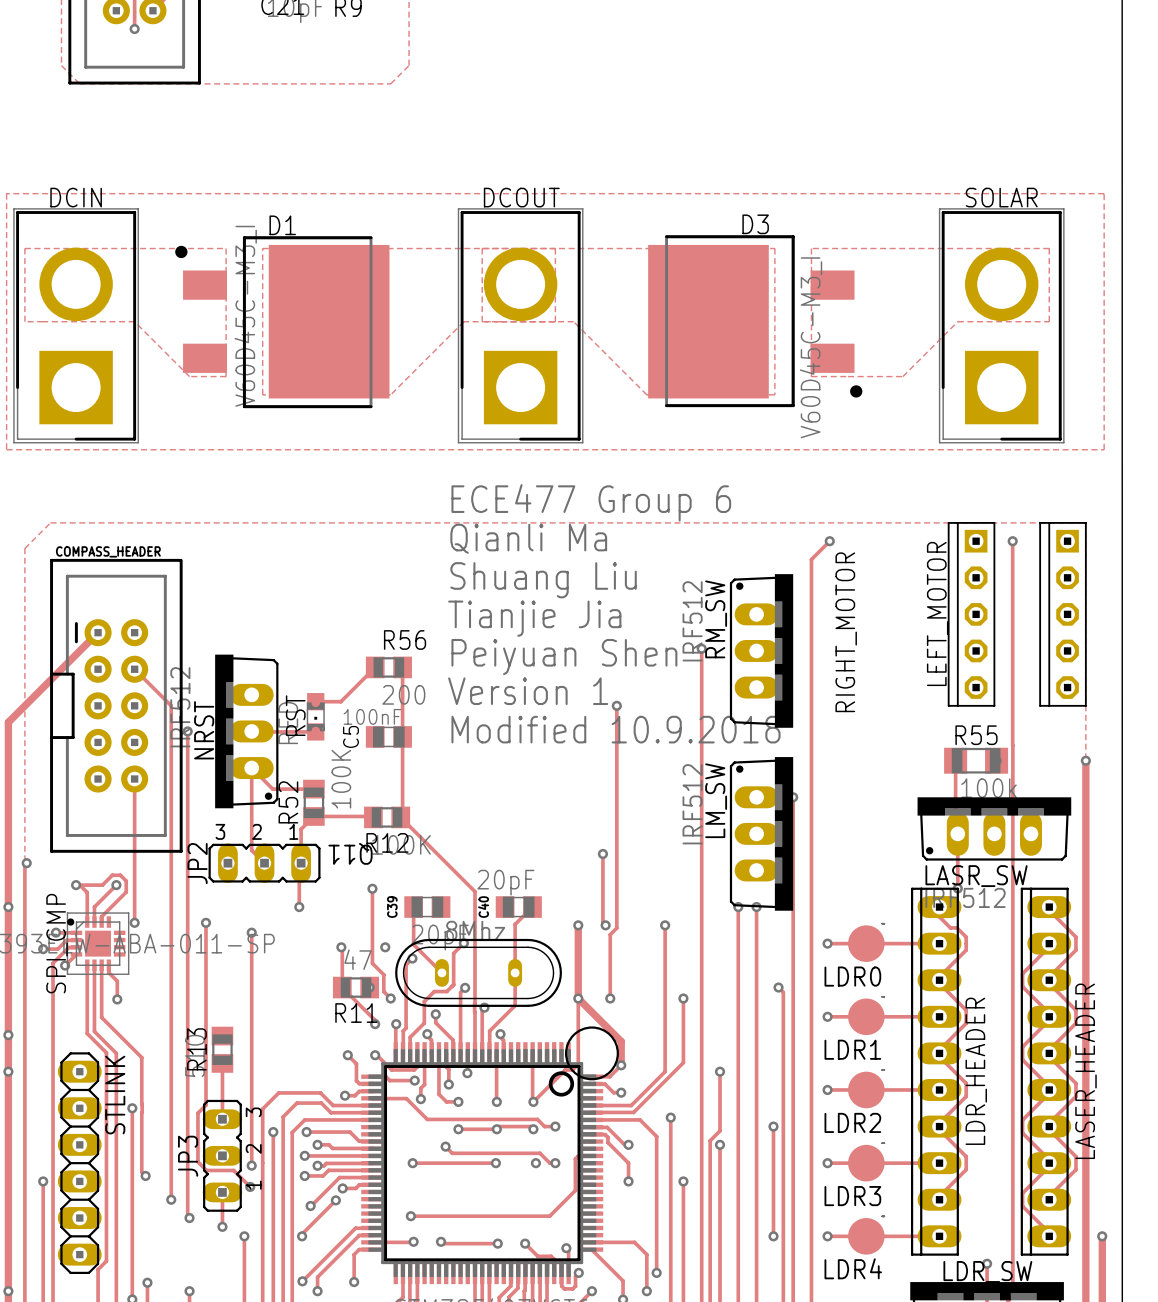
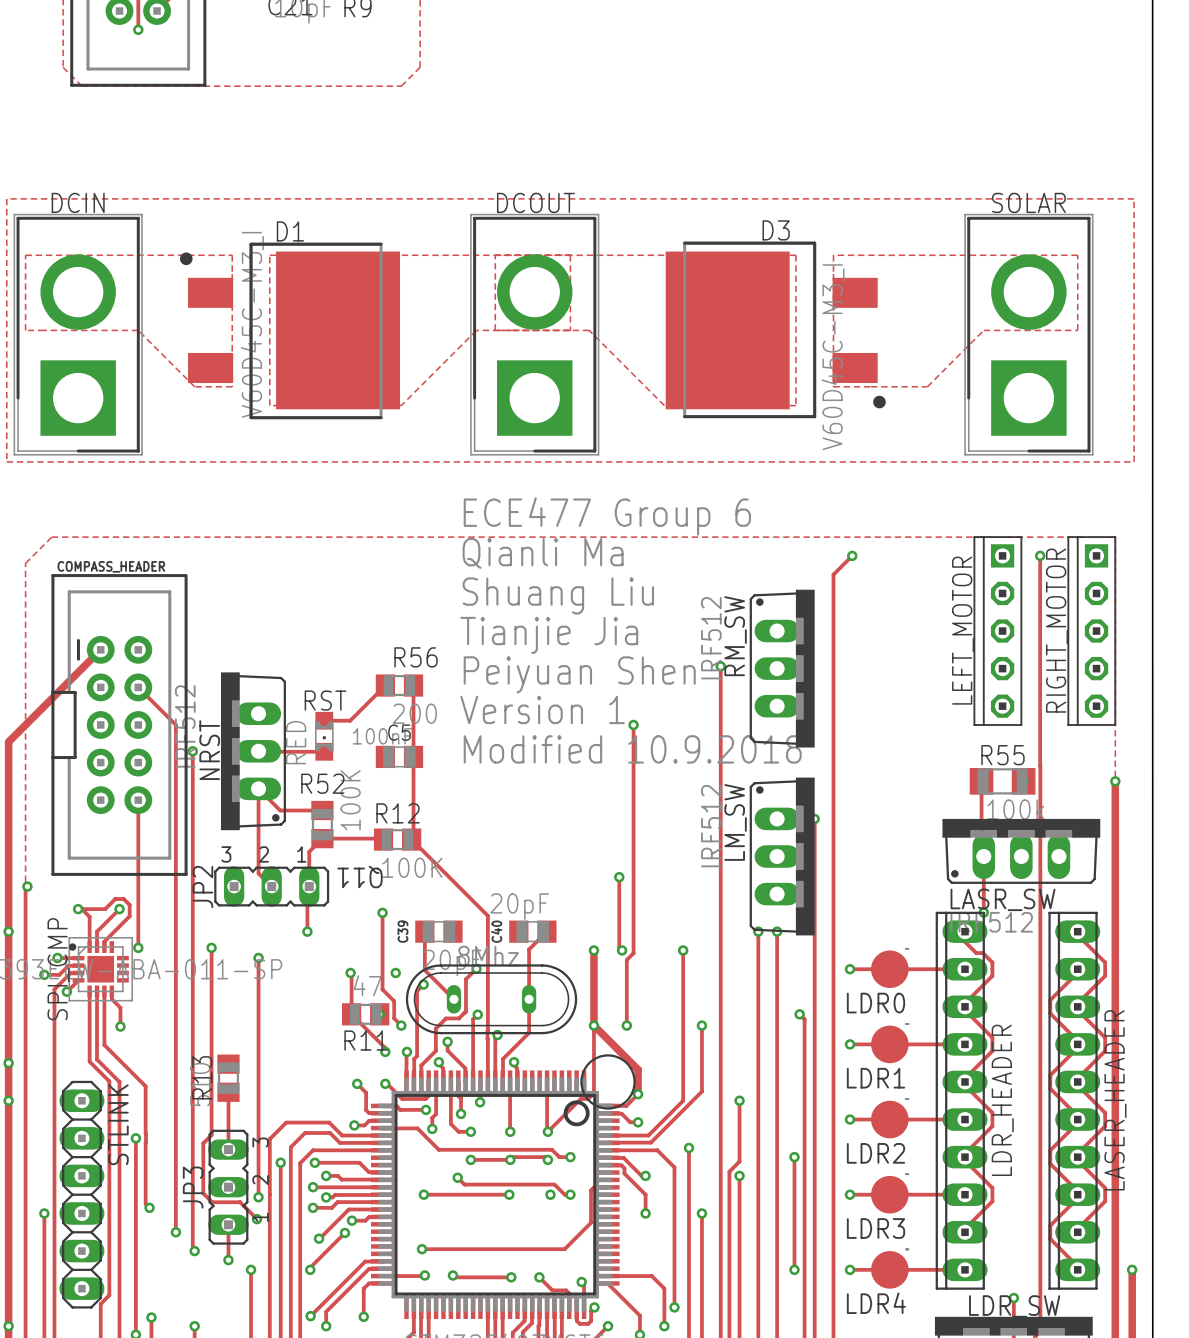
RIGHT_MOTOR name position: RIGHT_MOTOR (846, 632) -> RIGHT_MOTOR (1057, 630)
RST name rotation: 0° (295, 715) -> 90° clockwise (325, 700)
C5 name rotation: 0° (350, 736) -> 90° clockwise (399, 732)
C5 name position: C5 (350, 736) -> C5 (399, 732)
R52 name rotation: 0° (288, 802) -> 90° clockwise (322, 783)
R12 name position: R12 (387, 842) -> R12 (397, 813)

